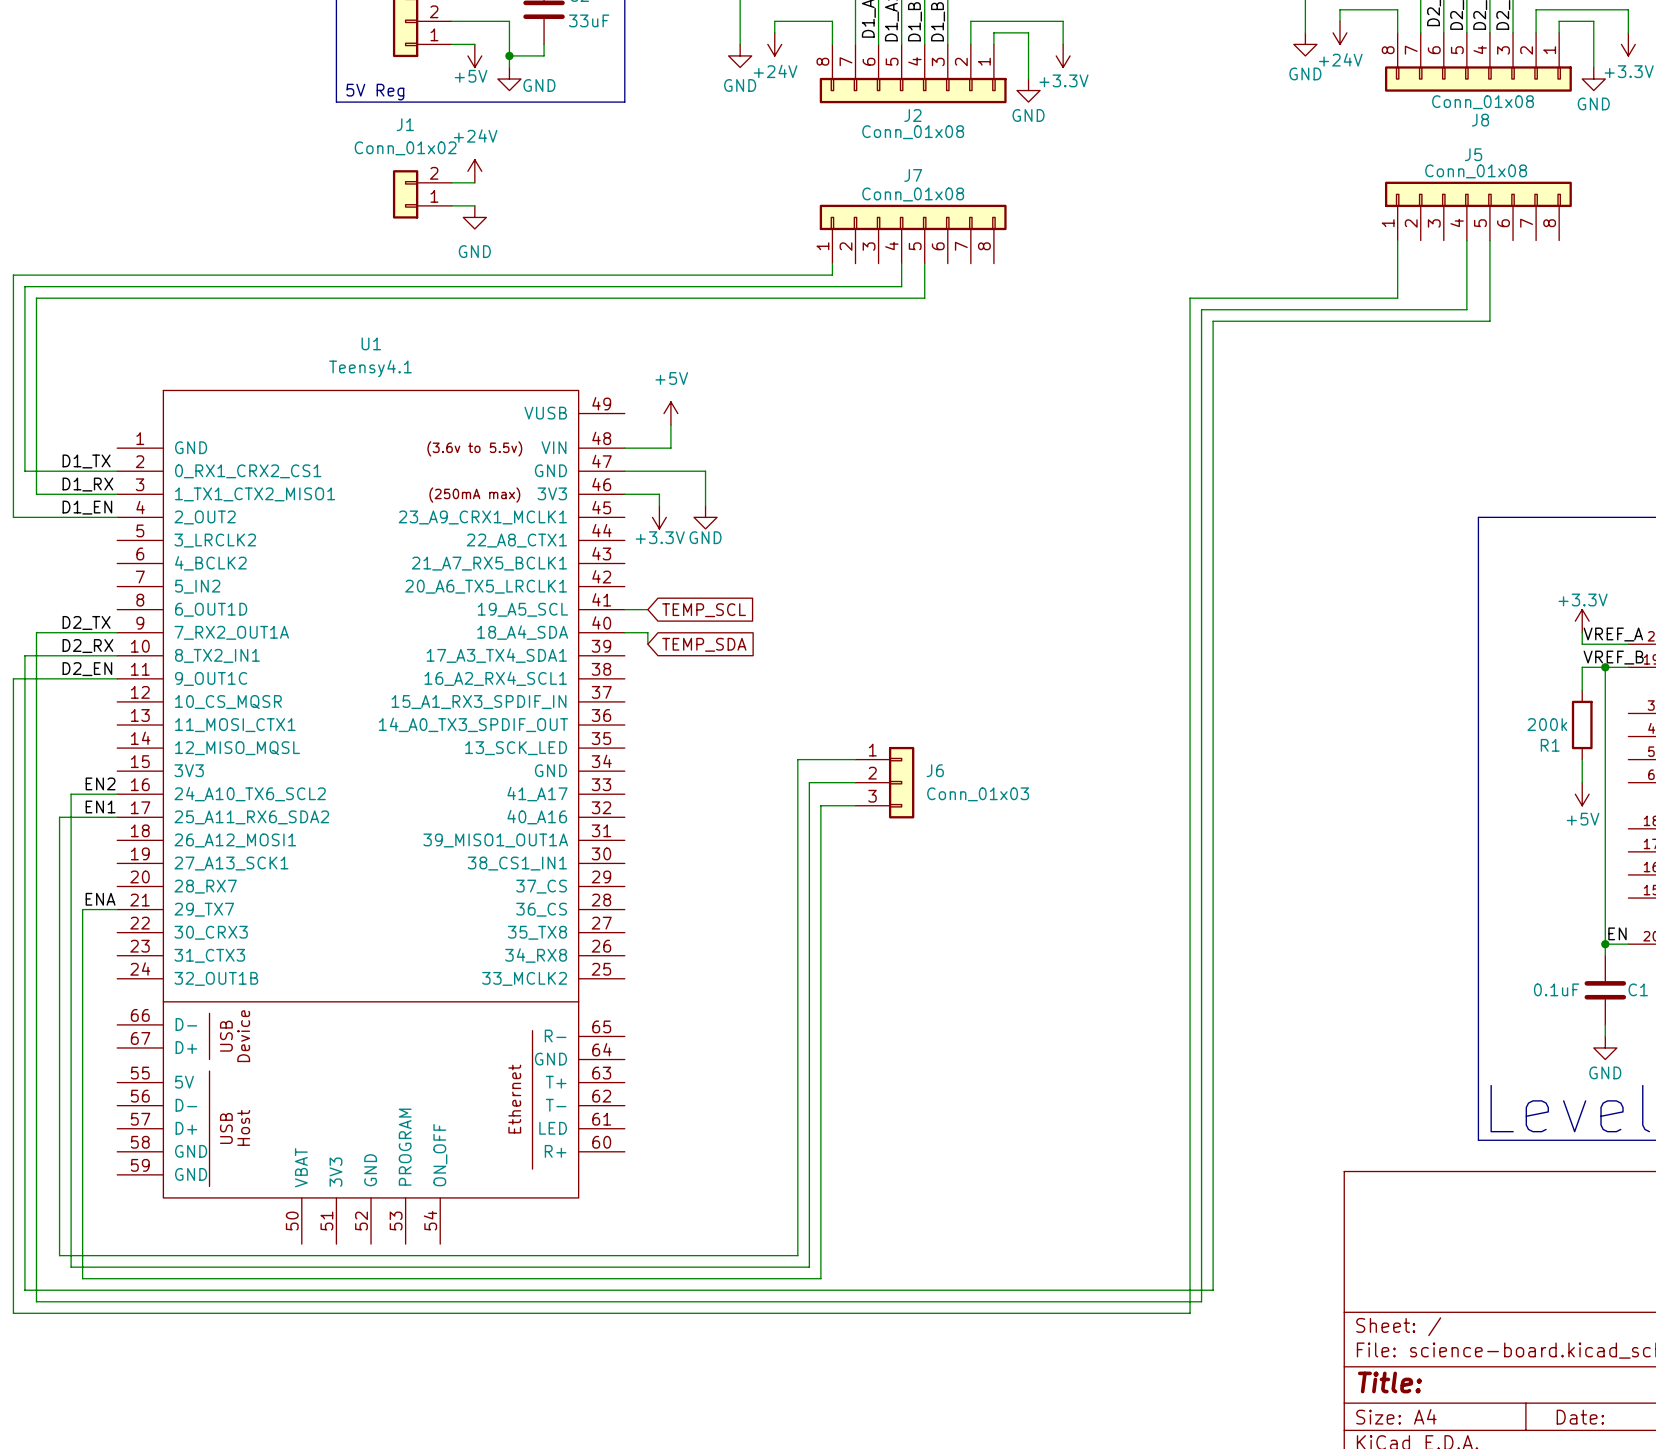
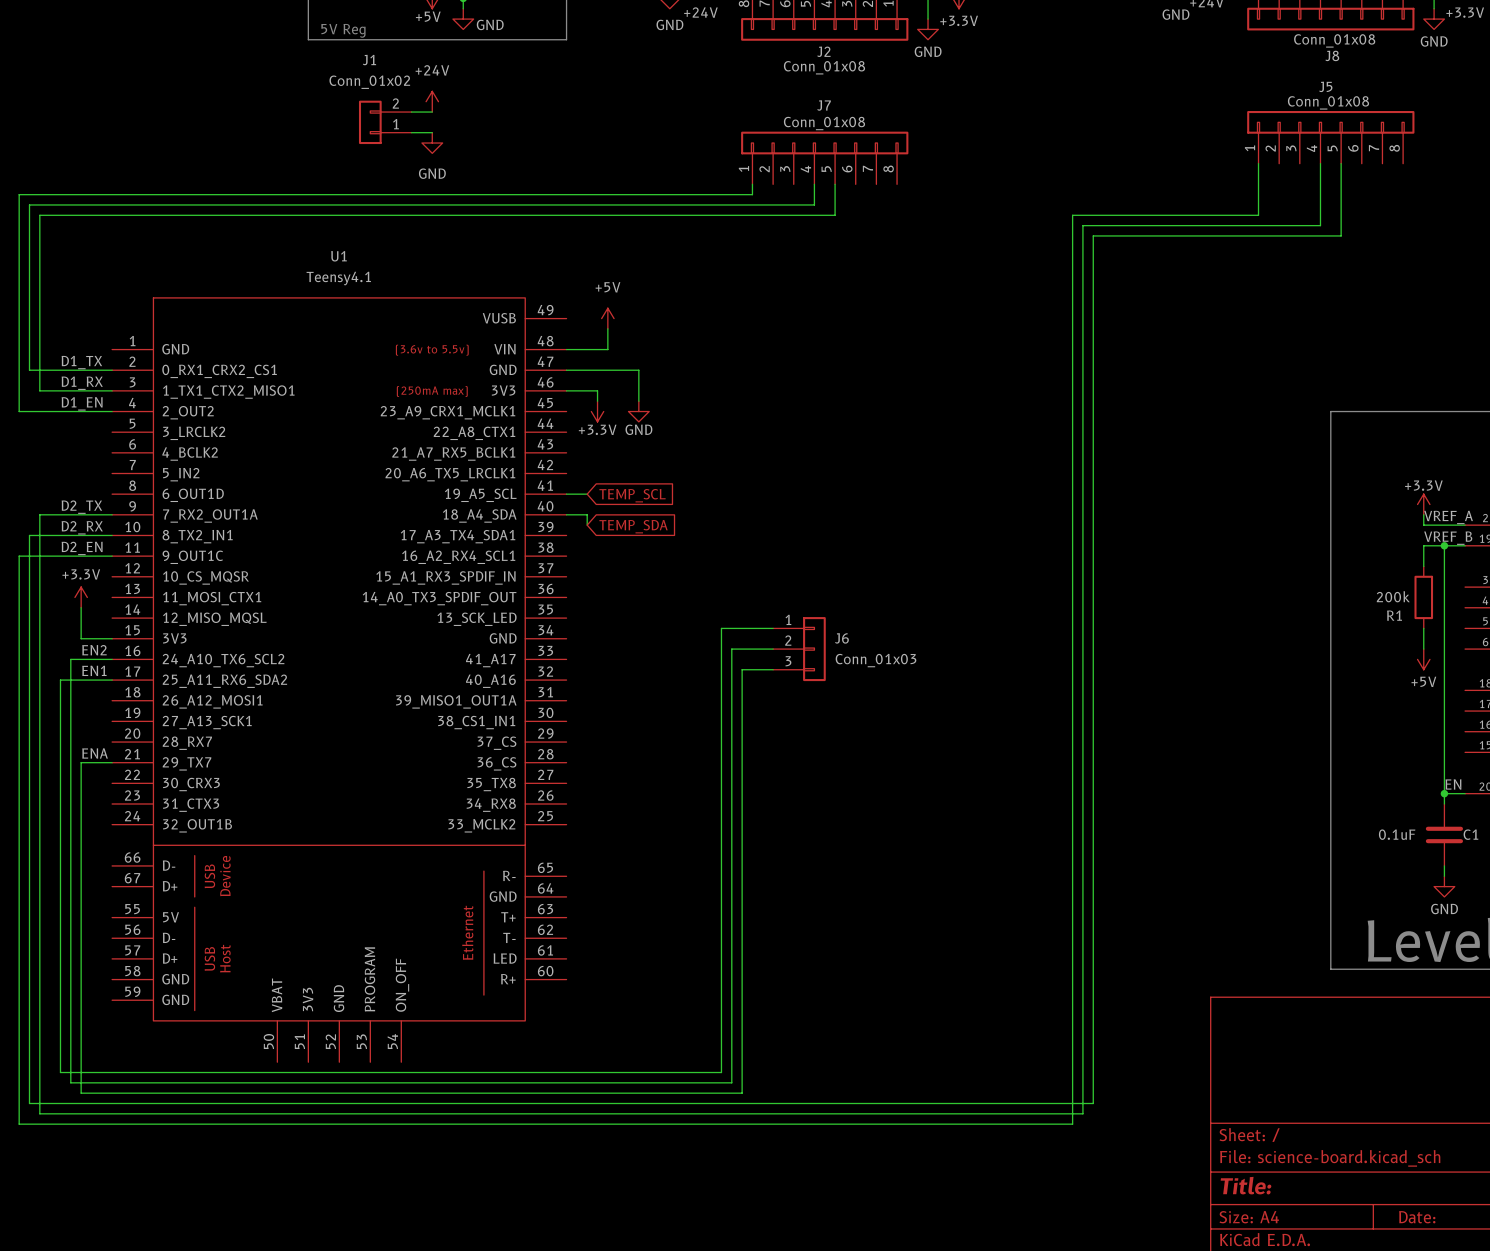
power symbol: none -> +3.3V (81, 597)
wire: none -> (81, 607) (81, 638) (112, 638)

